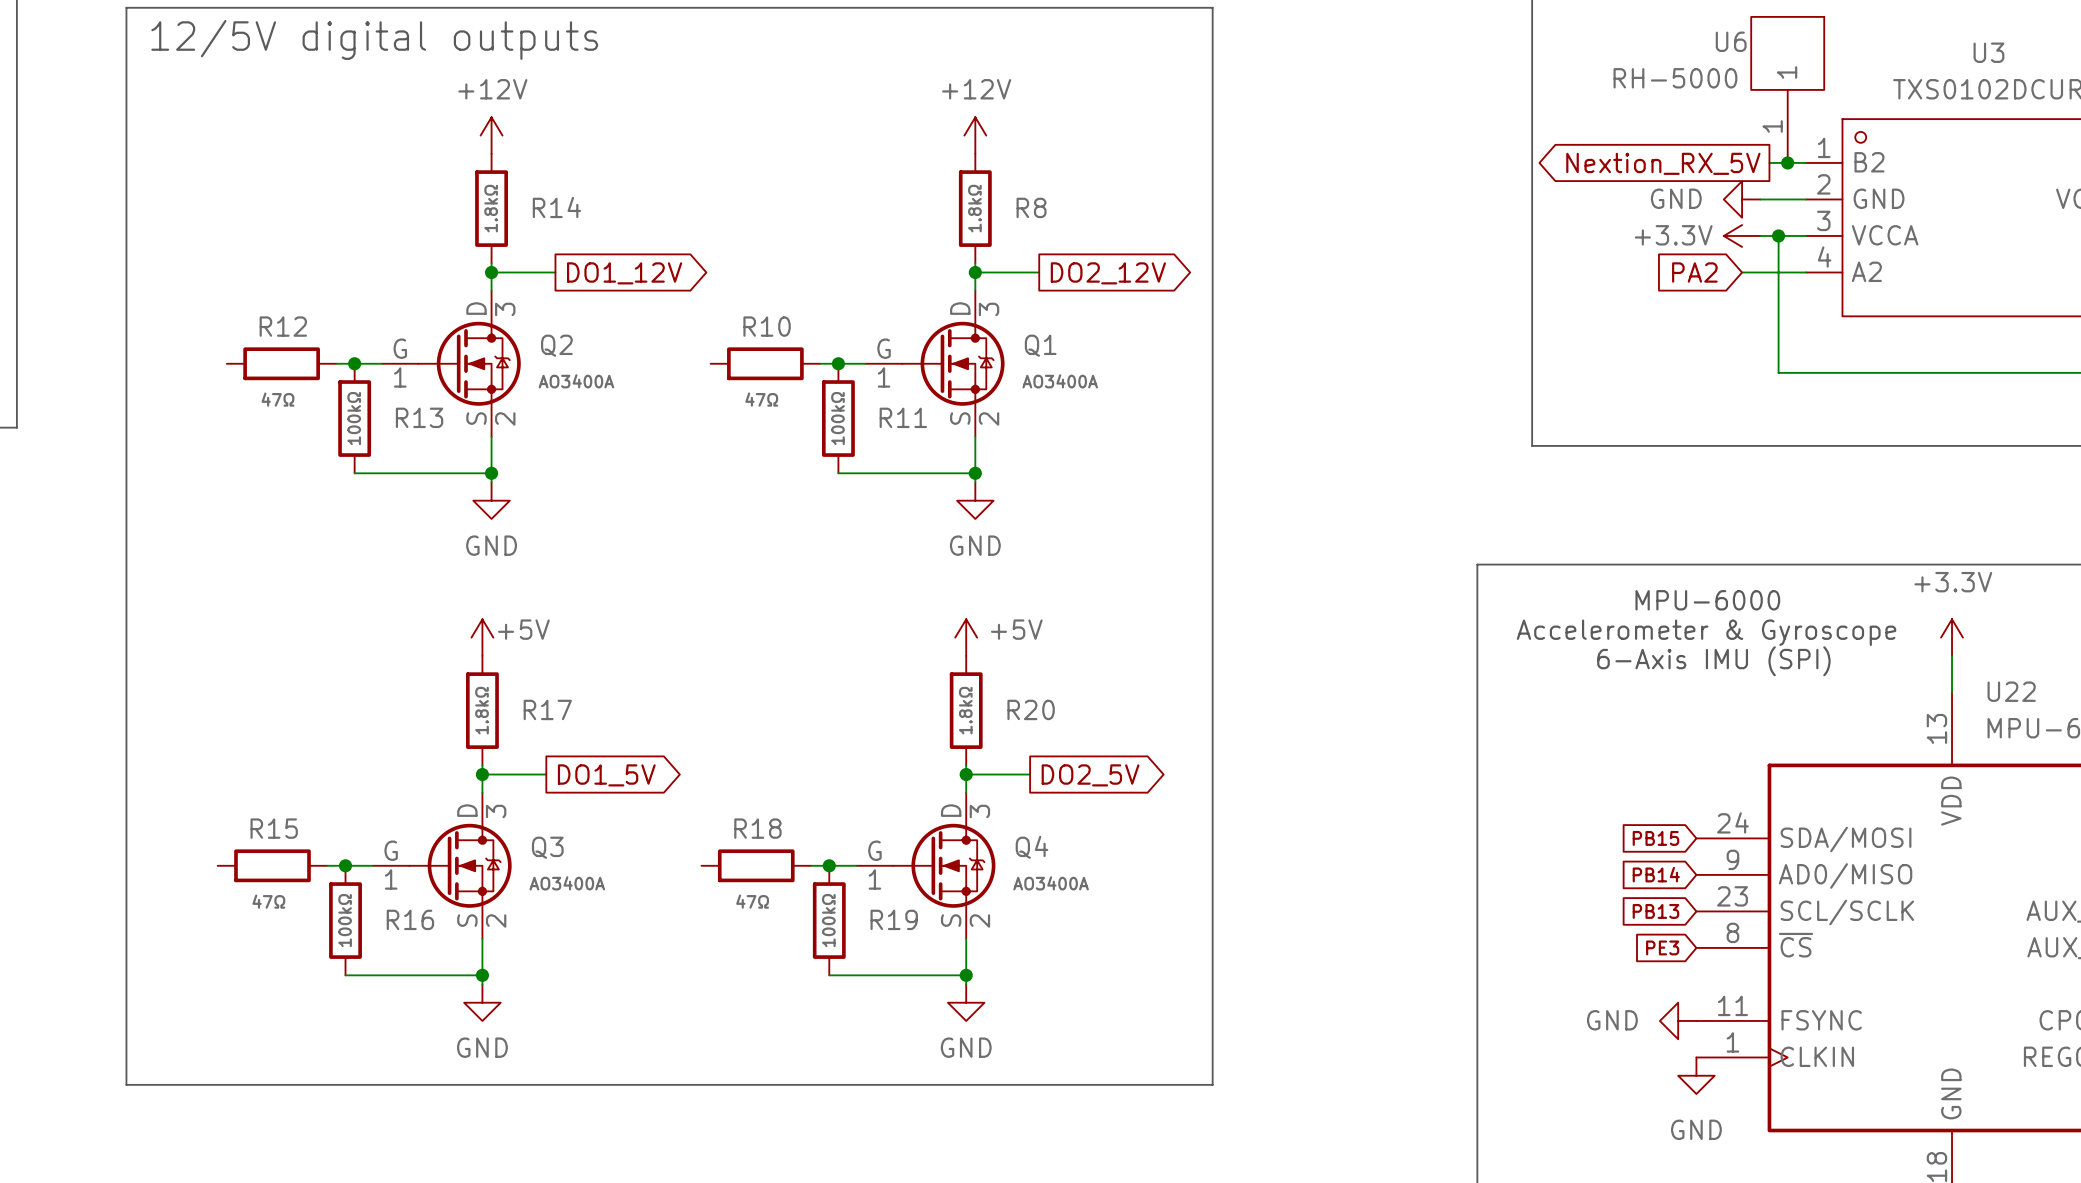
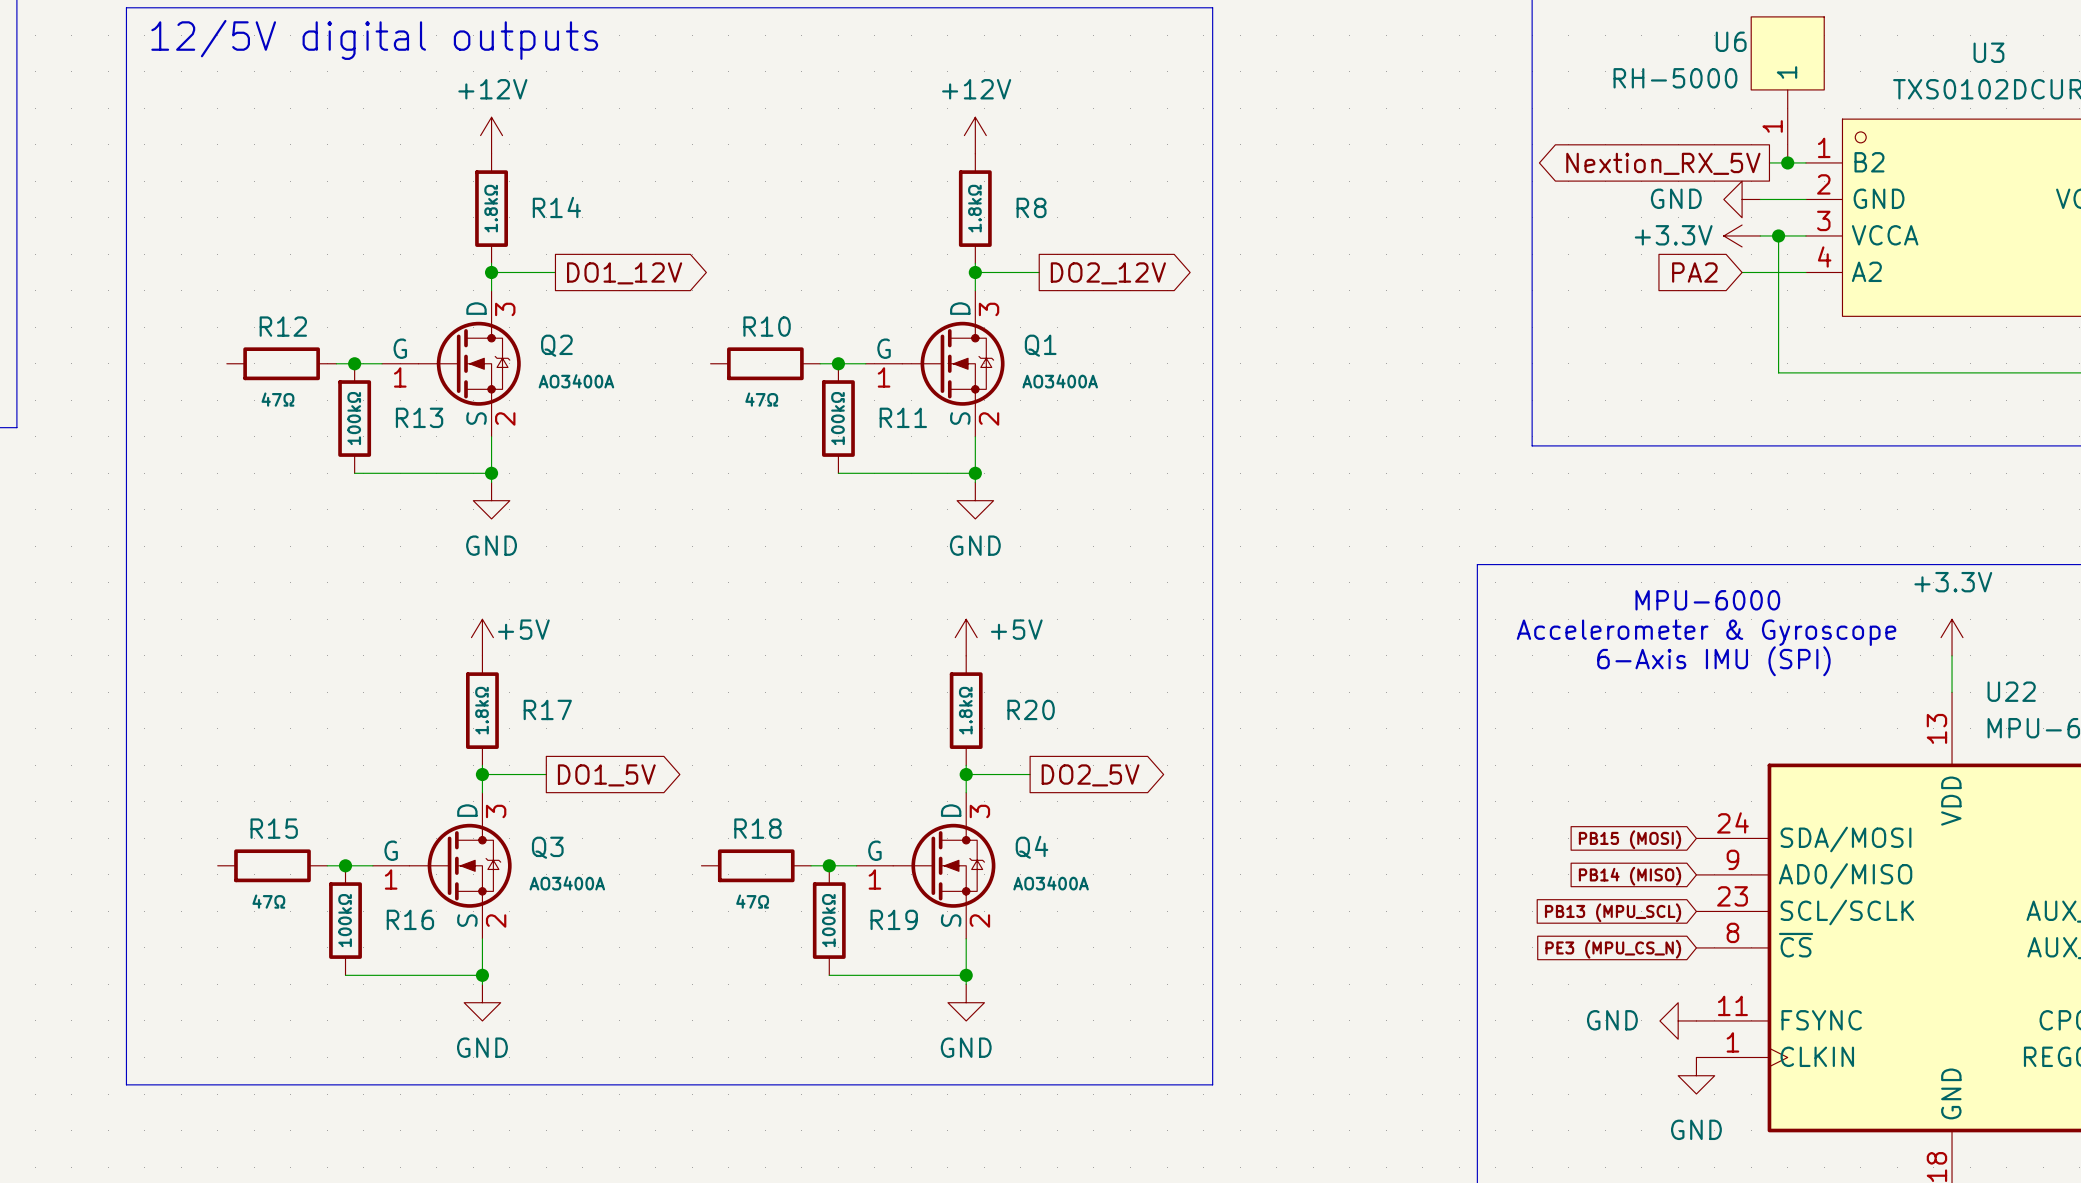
global label: PB15 (1655, 838) -> PB15 (MOSI) (1629, 839)
global label: PB14 (1656, 874) -> PB14 (MISO) (1629, 876)
global label: PB13 (1655, 911) -> PB13 (MPU_SCL) (1613, 912)
global label: PE3 (1662, 947) -> PE3 (MPU_CS_N) (1613, 949)

